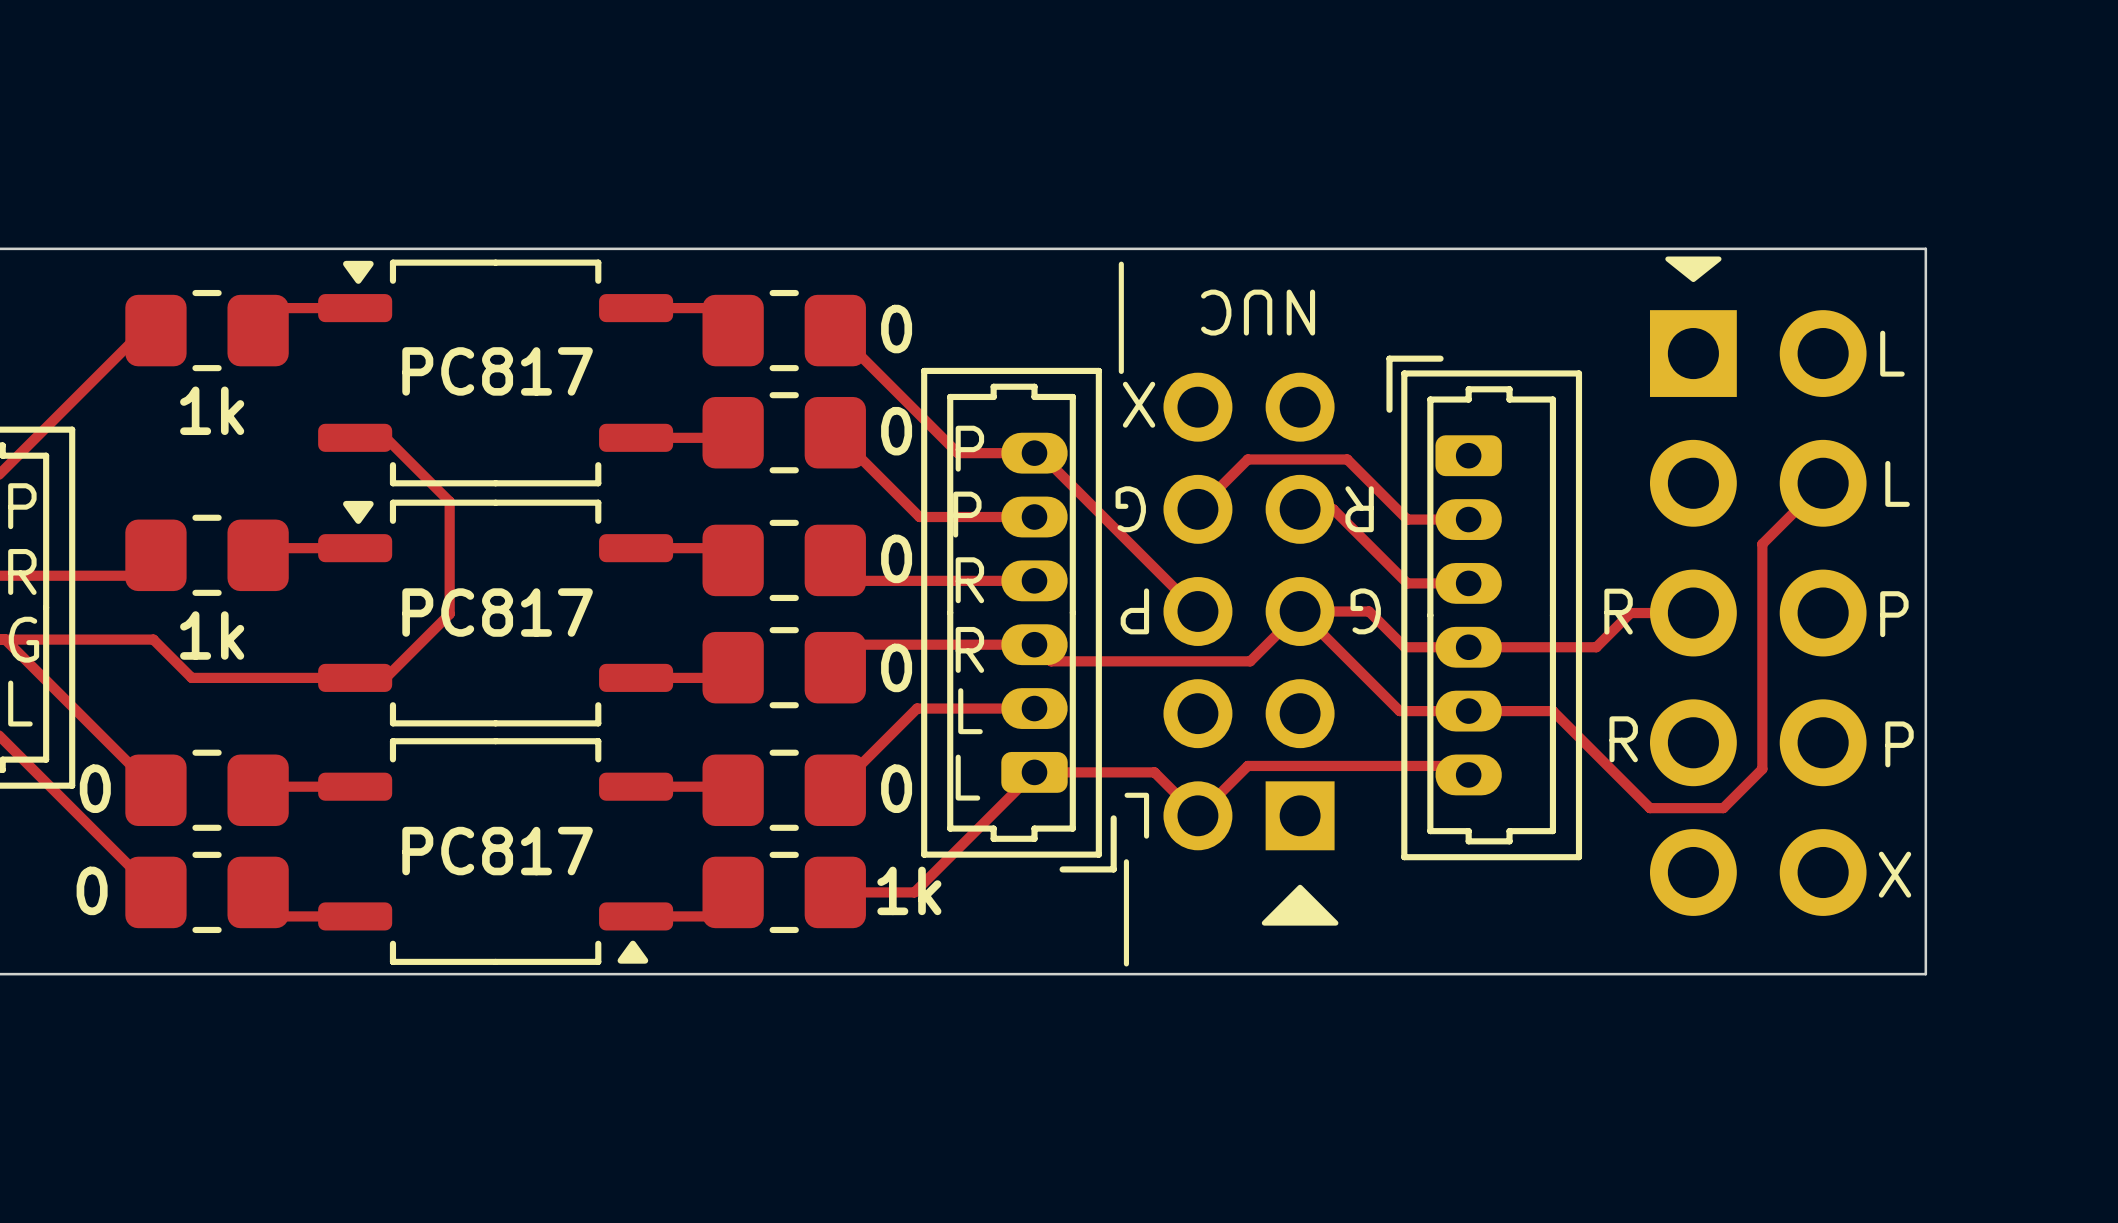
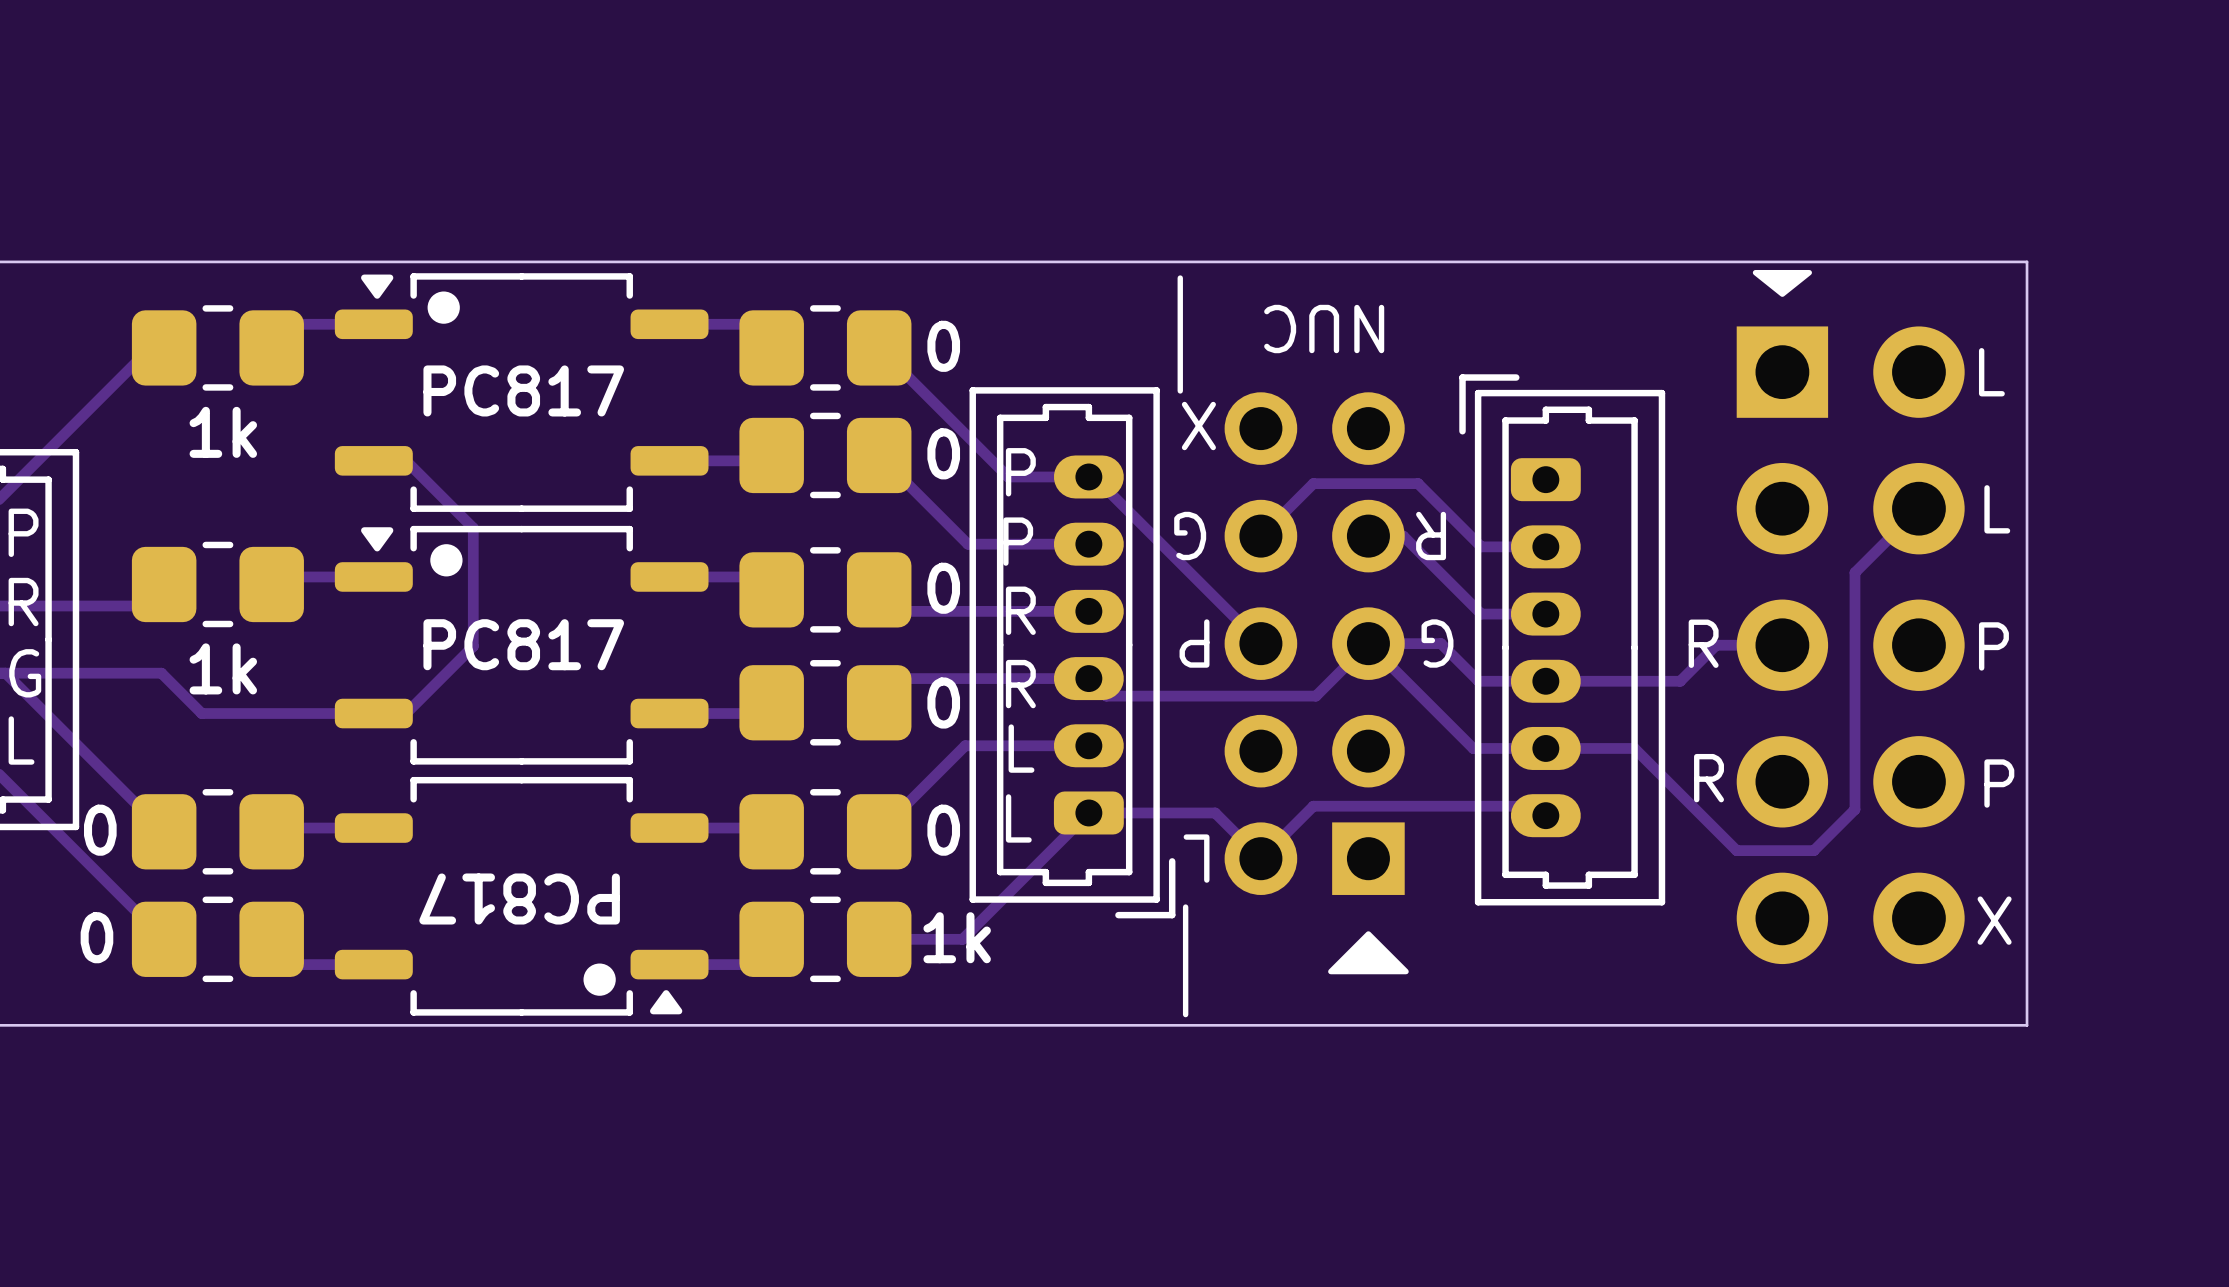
drawing: none -> [427, 291, 460, 324]
drawing: none -> [430, 544, 463, 577]
part value rotation: 0° (497, 851) -> 180° (519, 899)
drawing: none -> [583, 963, 616, 996]

